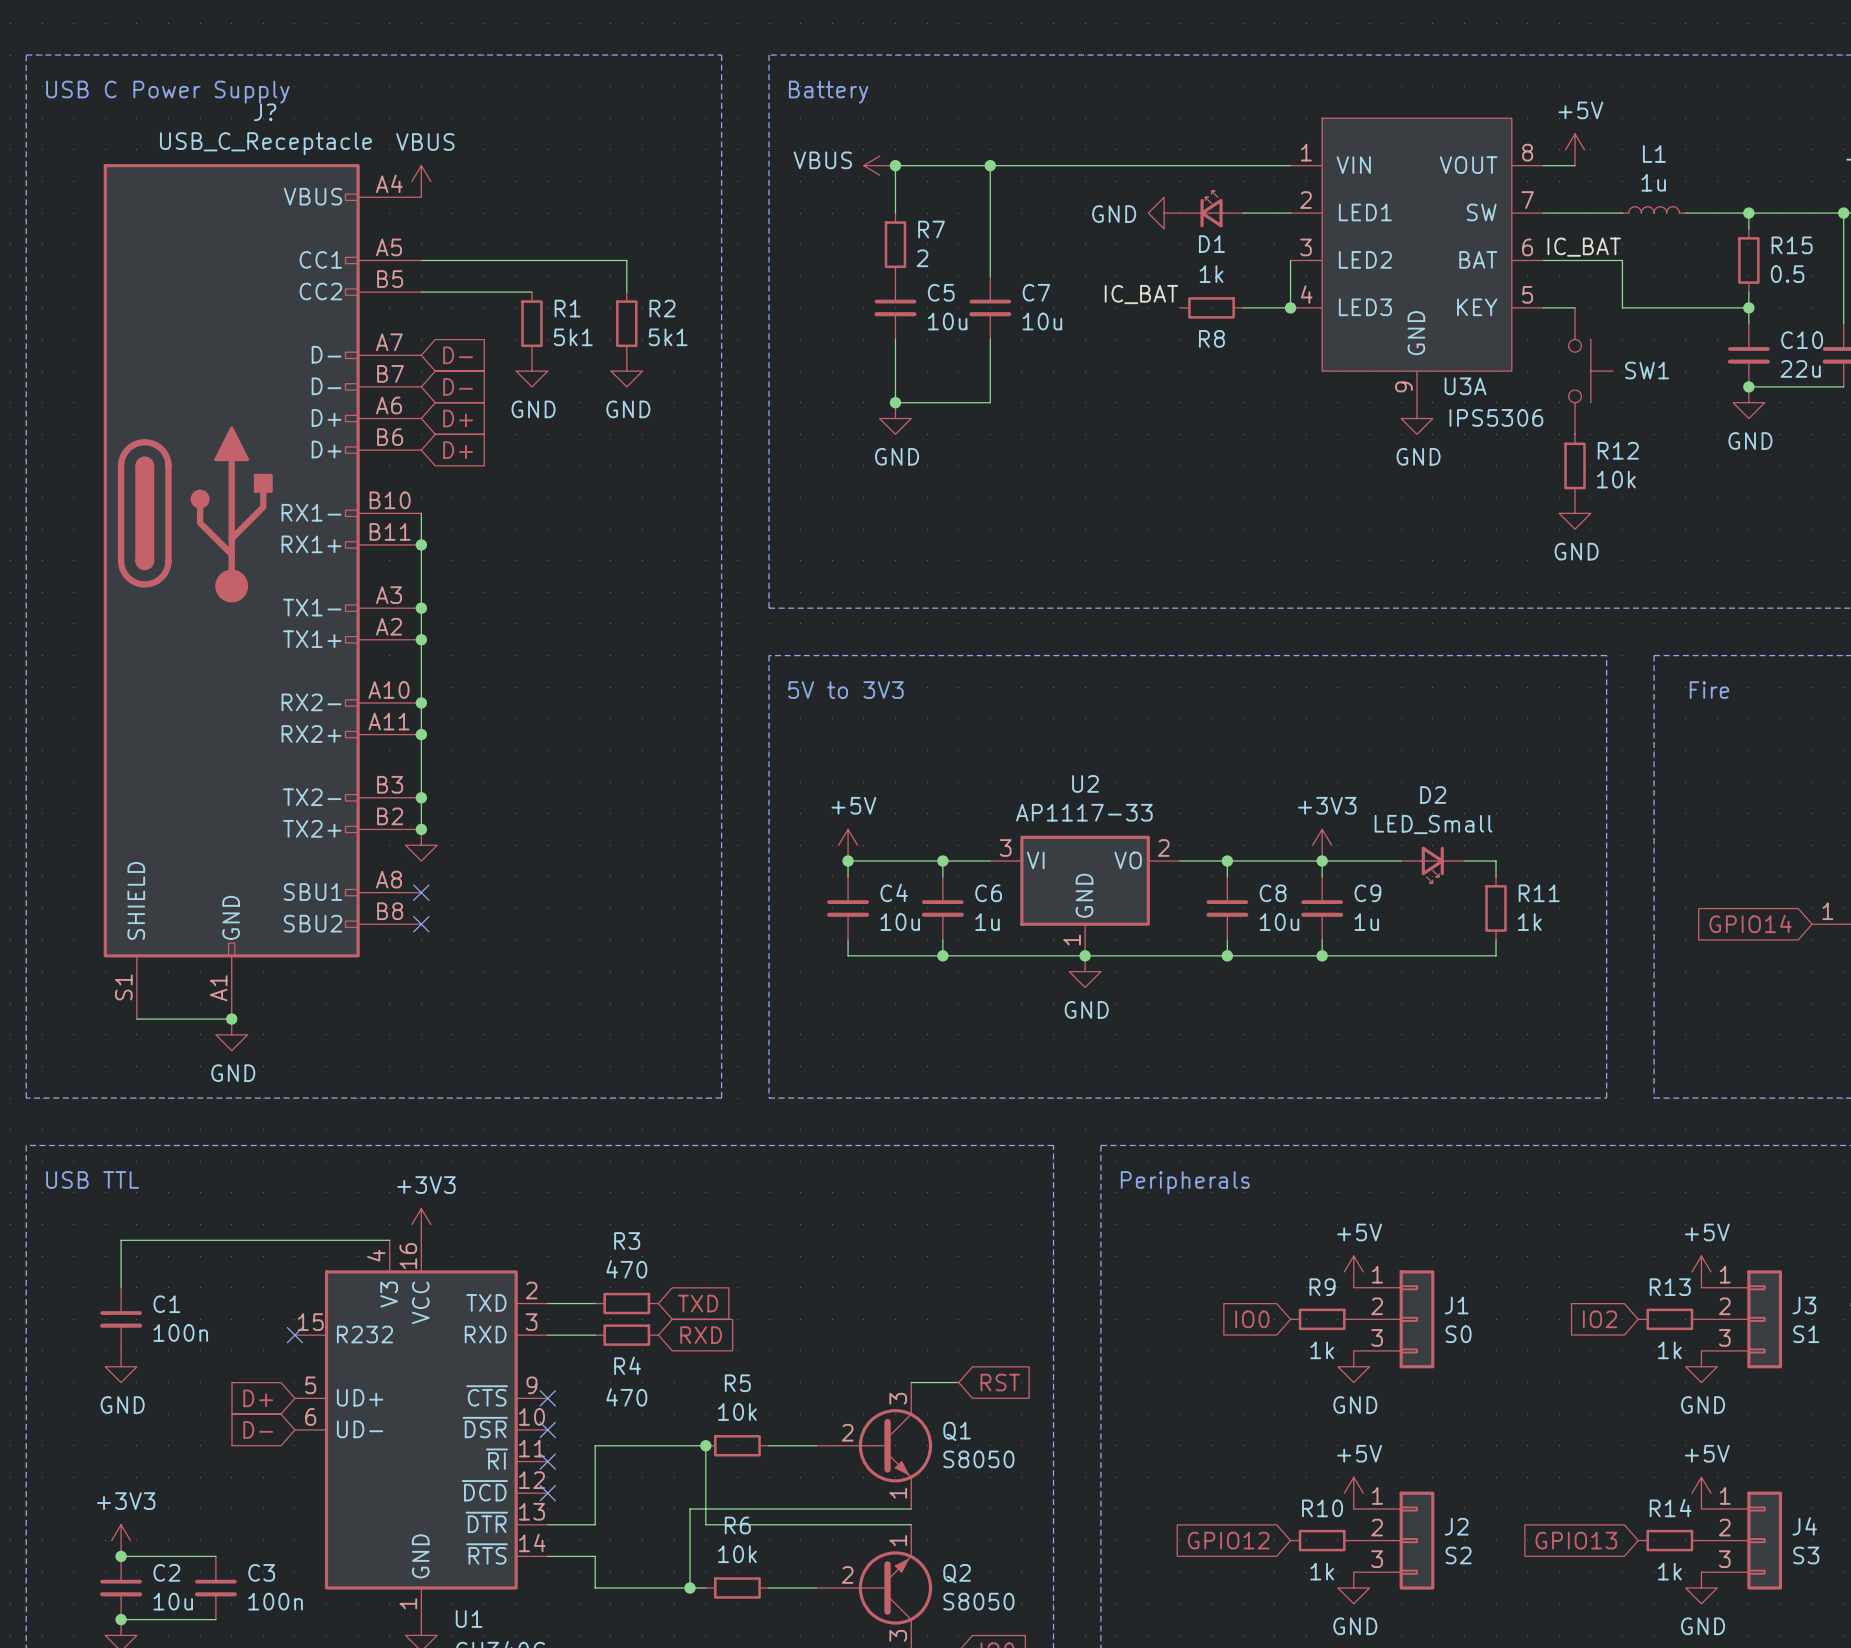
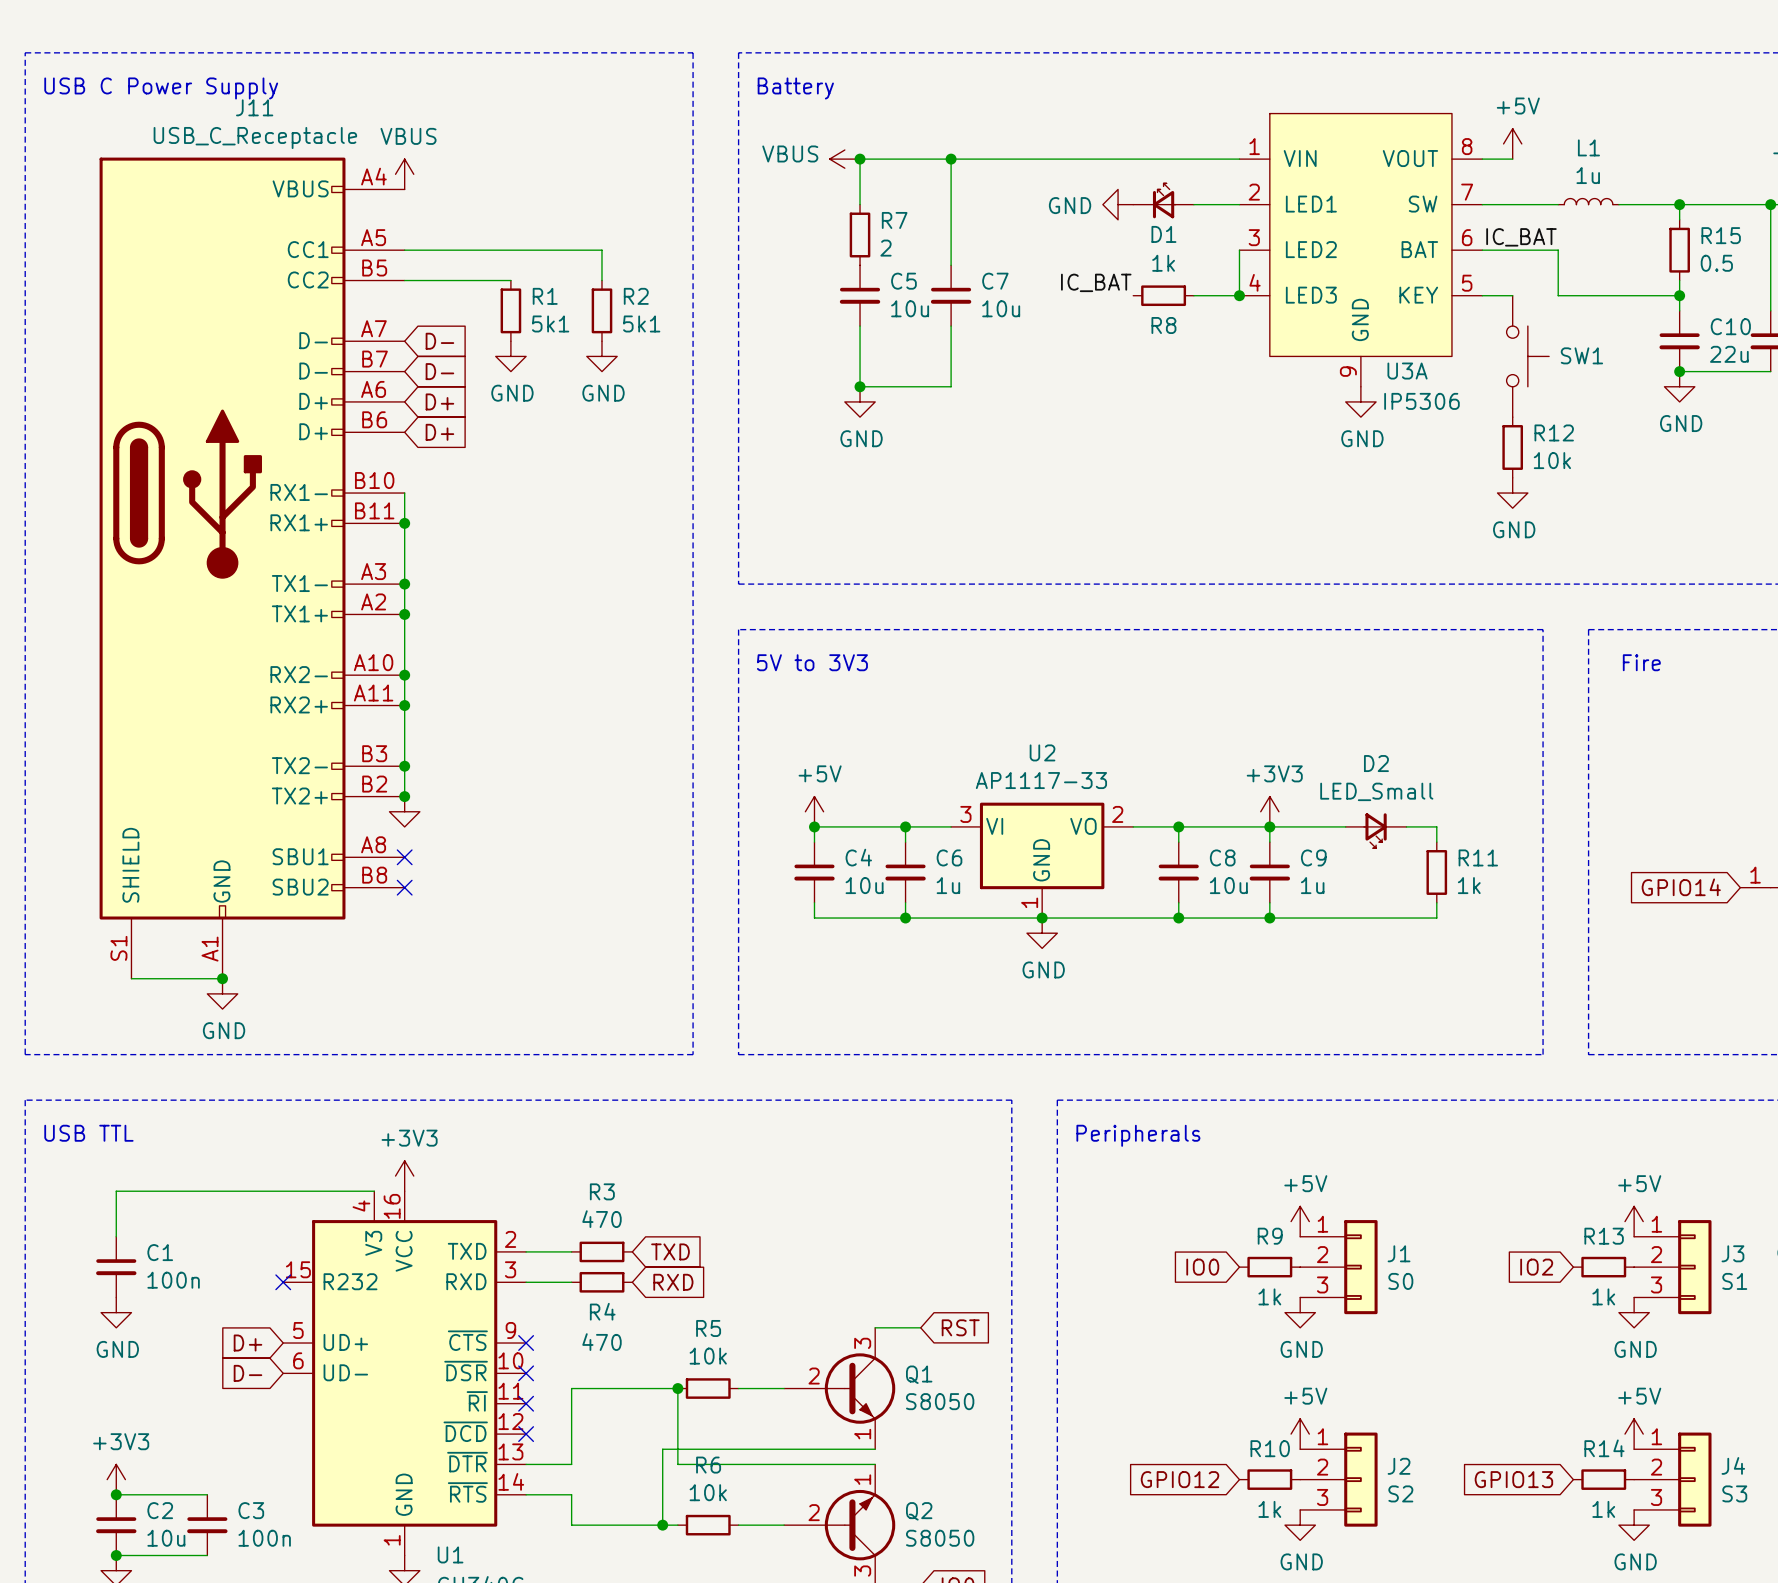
J? name: J? (265, 112) -> J11 (254, 107)
U3A value: IPS5306 (1496, 417) -> IP5306 (1421, 401)

